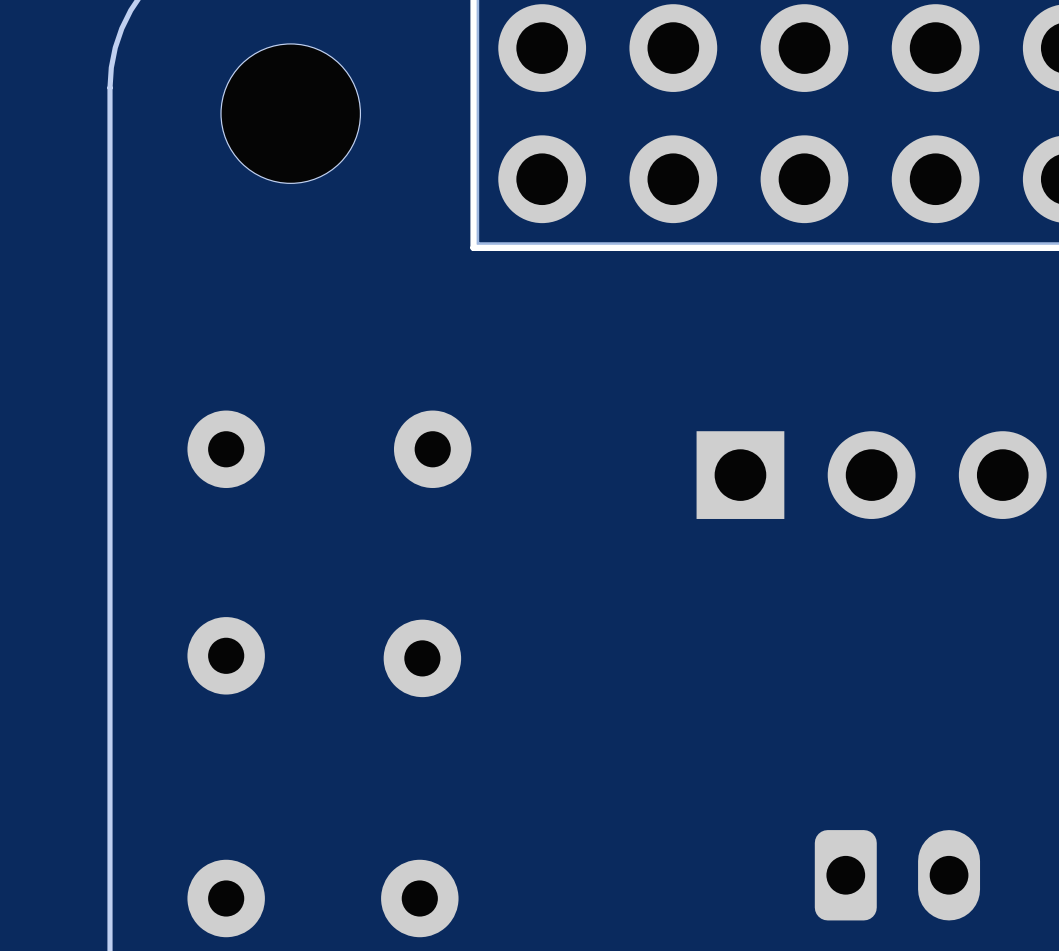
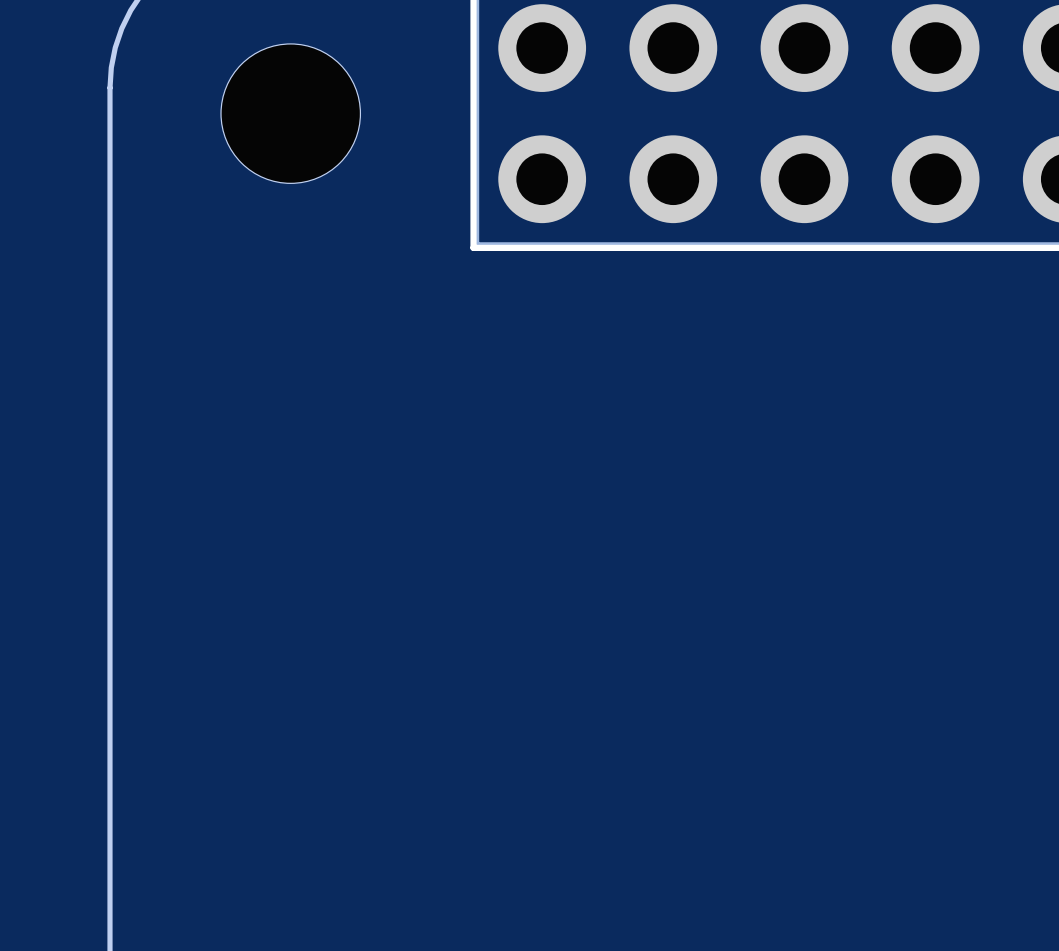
part: (226, 449) -> none
part: (432, 449) -> none
part: (871, 475) -> none
part: (226, 655) -> none
part: (422, 658) -> none
part: (897, 875) -> none
part: (226, 898) -> none
part: (419, 898) -> none

